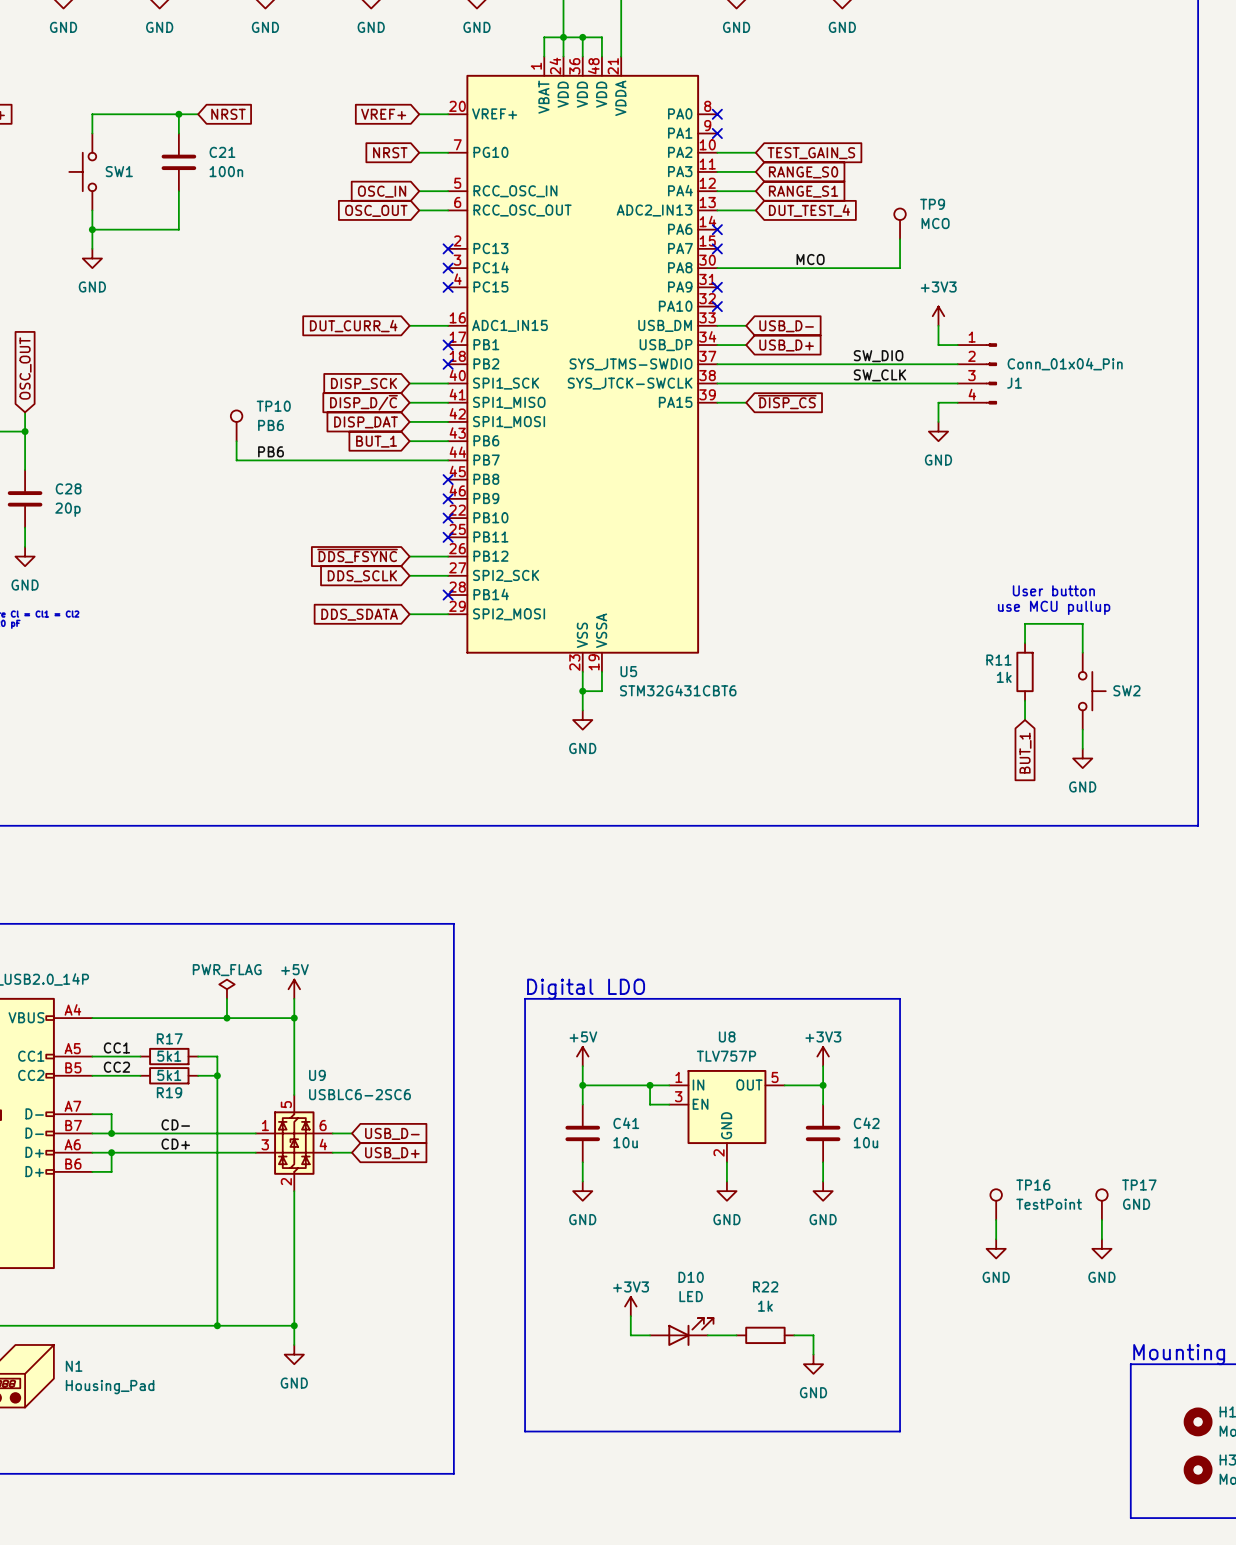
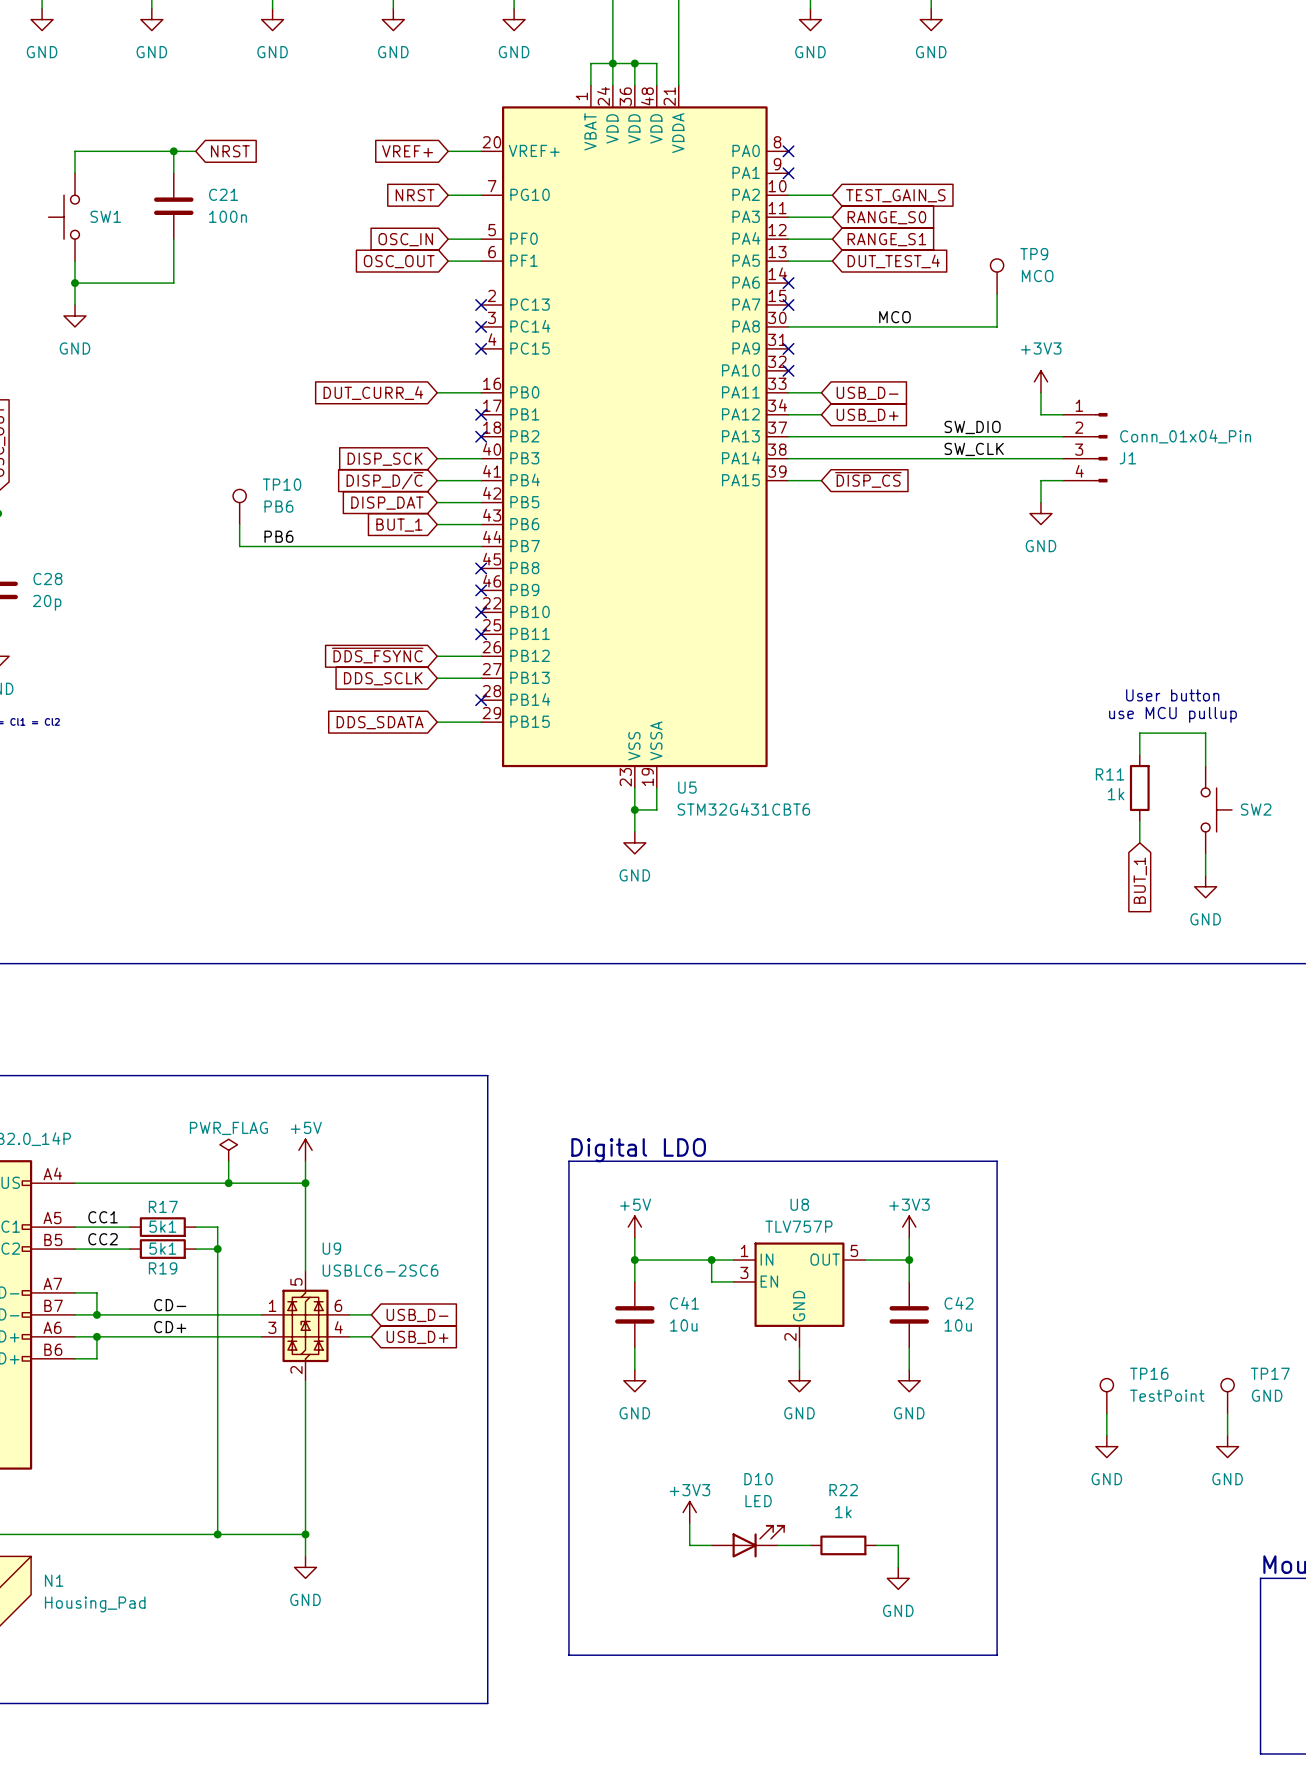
U5 symbol: [448, 56, 718, 672] -> [481, 85, 789, 789]

